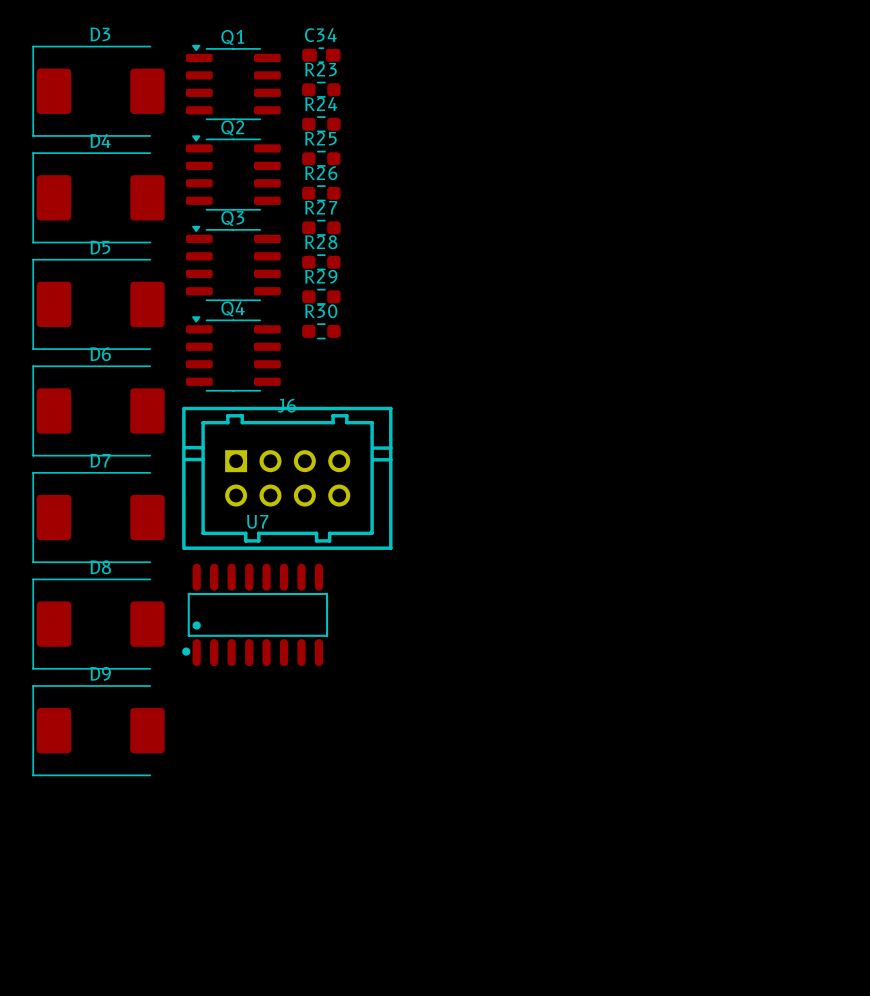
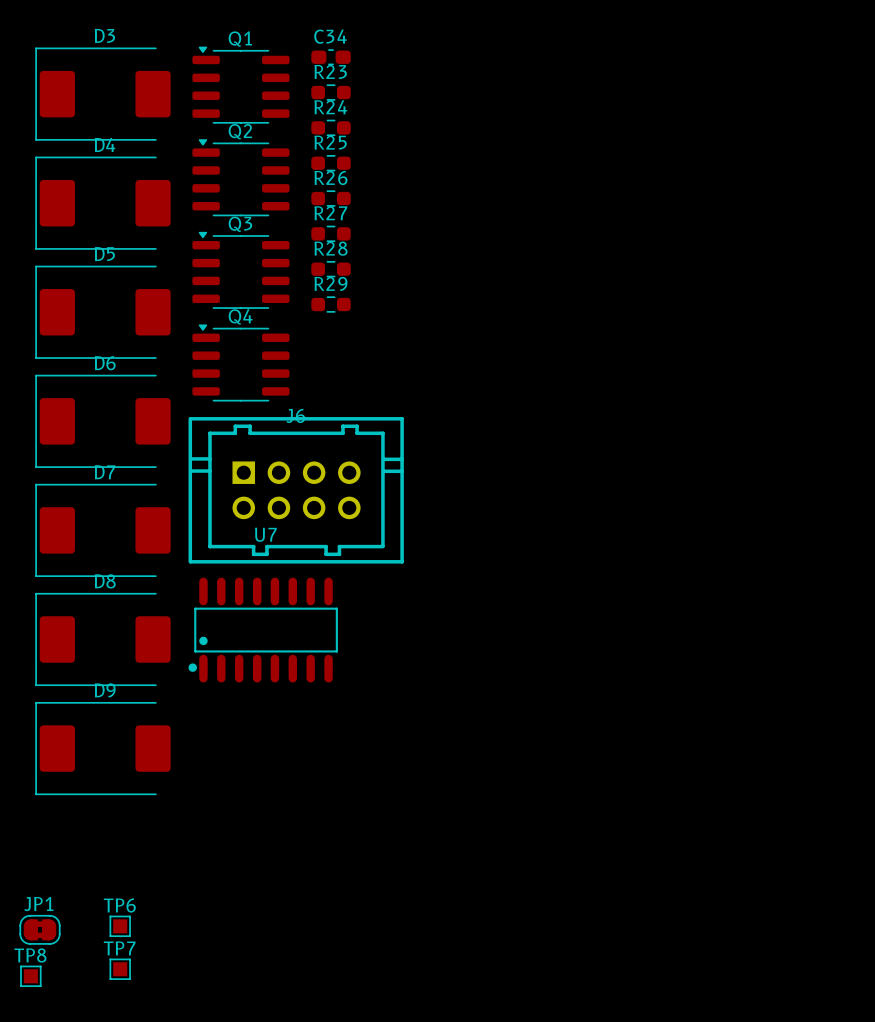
R30: (321, 331) -> none
TP6: none -> (120, 926)
JP1: none -> (40, 929)
TP7: none -> (120, 969)
TP8: none -> (30, 976)

